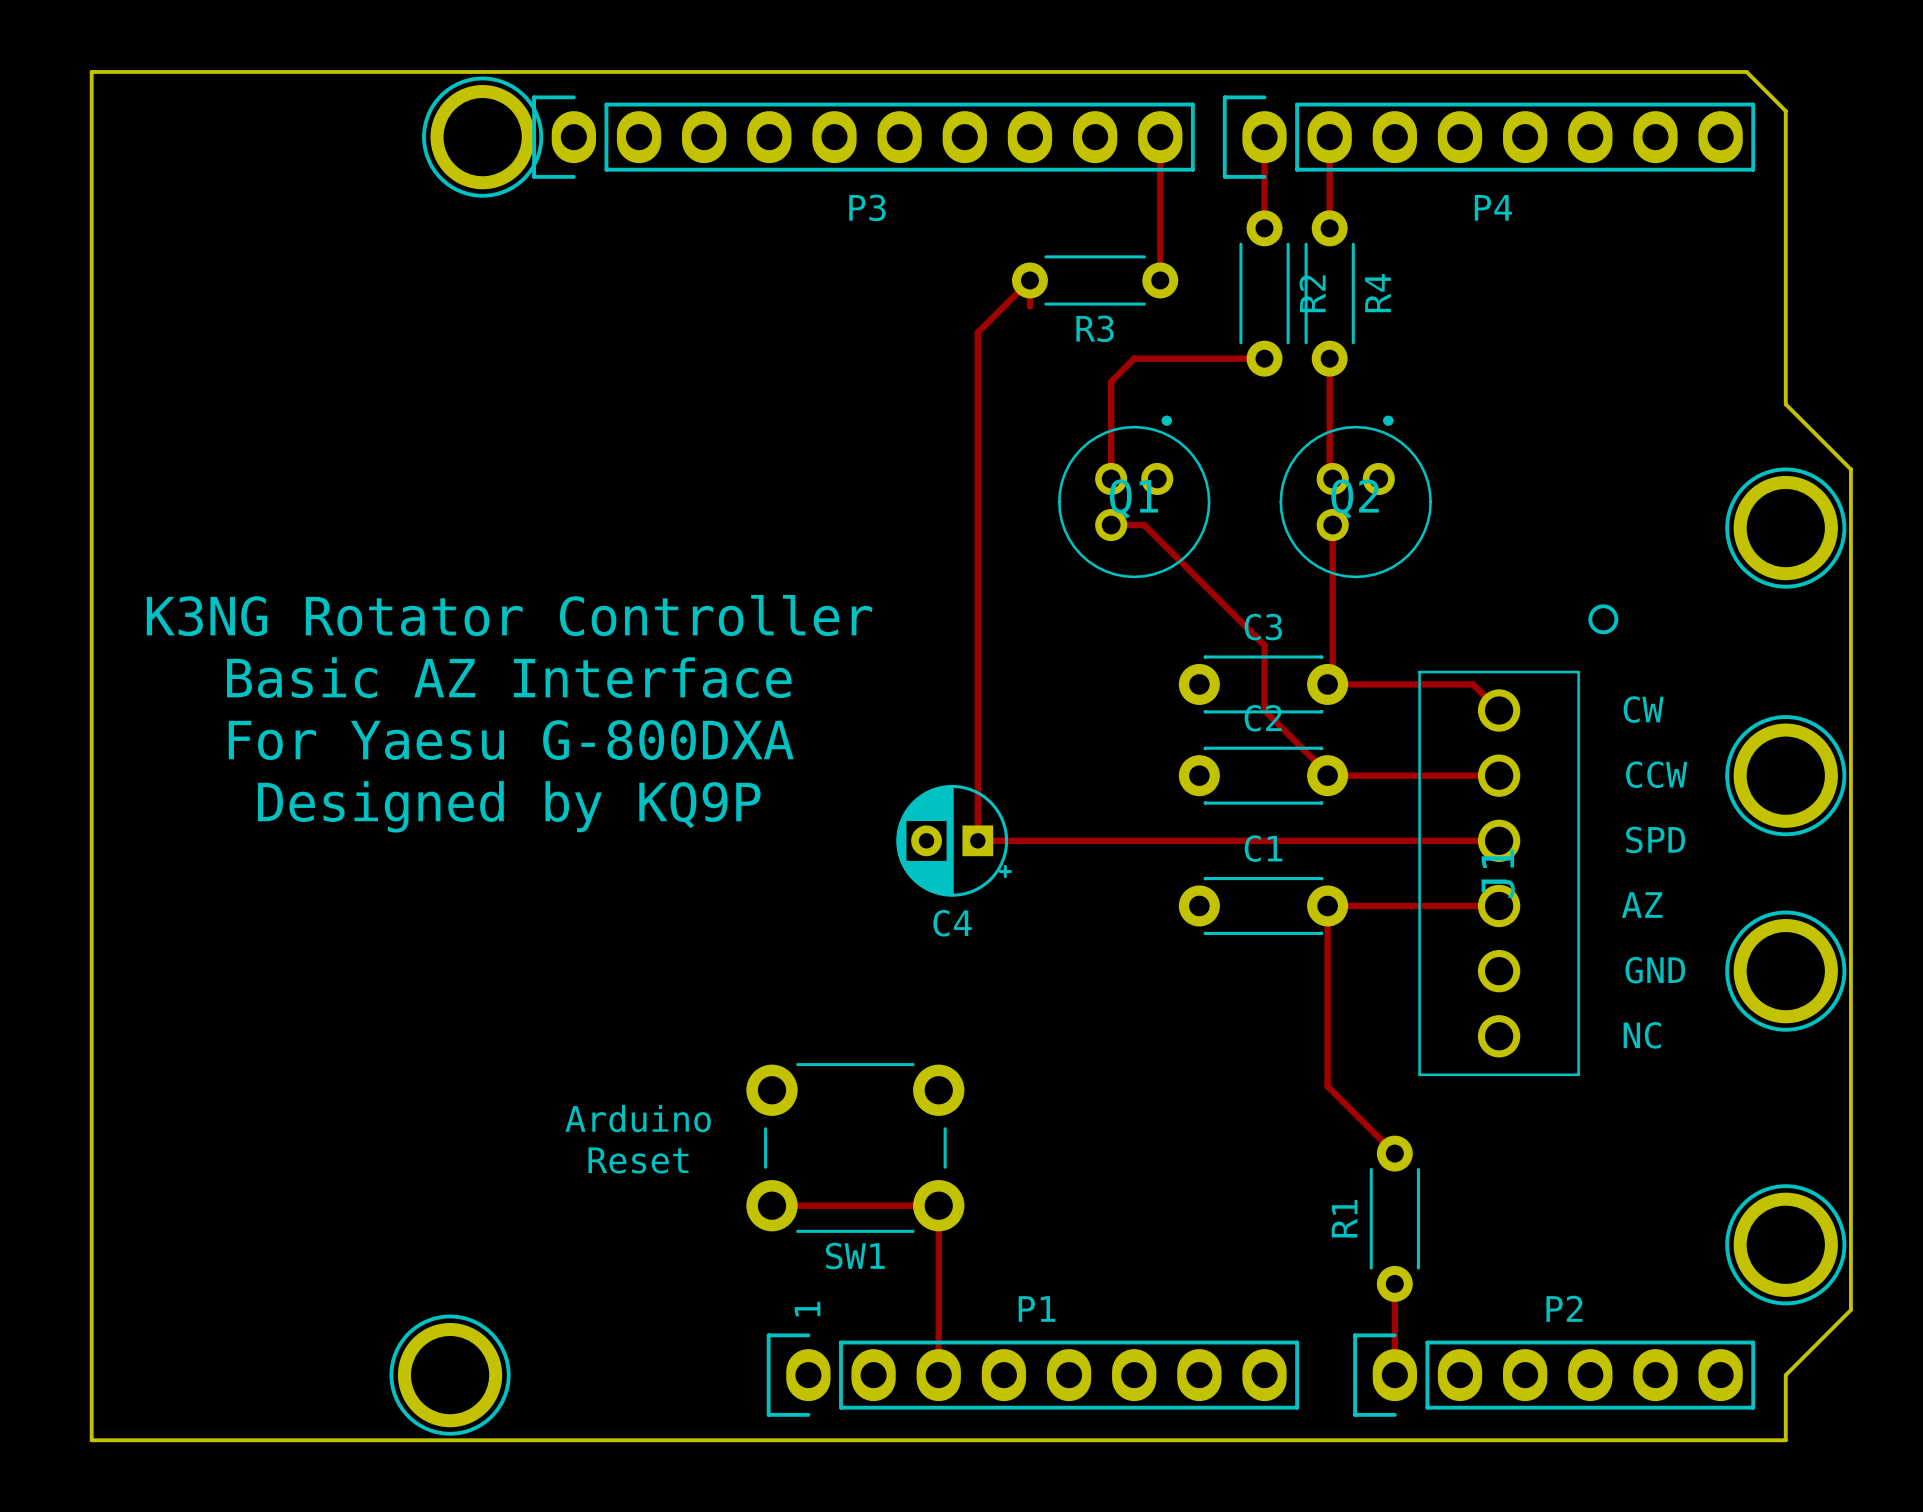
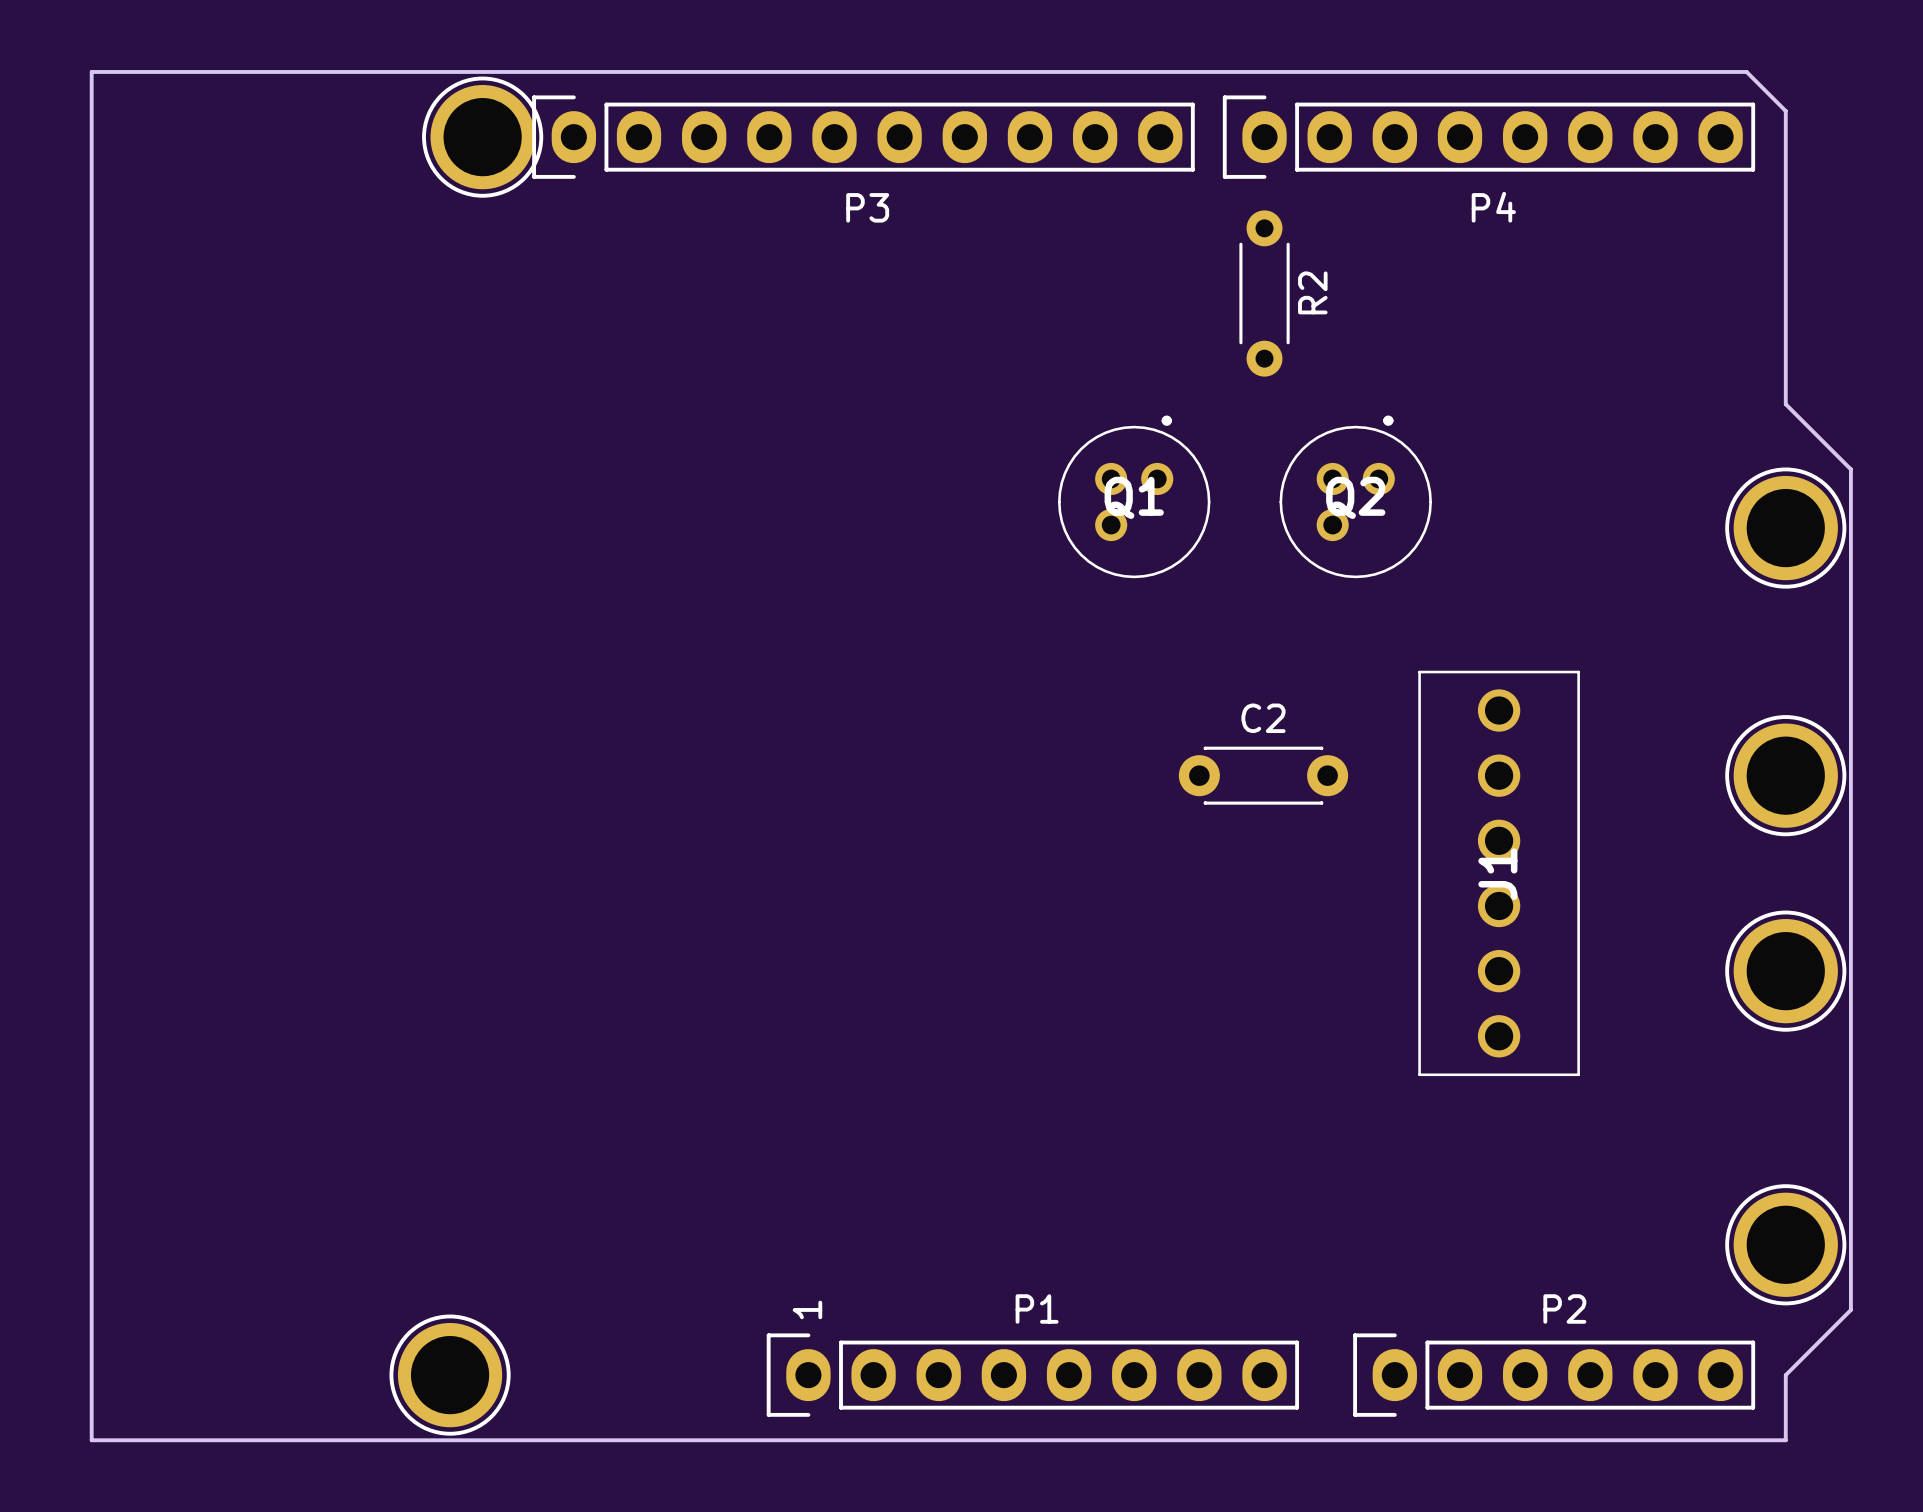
track: (1160, 137) (1160, 280) -> none
track: (1264, 137) (1264, 228) -> none
track: (1329, 137) (1329, 228) -> none
R3: (1095, 280) -> none
R4: (1329, 293) -> none
track: (1029, 306) (1029, 280) (977, 332) (977, 840) (1499, 840) -> none
track: (1264, 358) (1134, 358) (1111, 381) (1111, 478) -> none
track: (1329, 358) (1329, 475) (1332, 478) -> none
track: (1111, 525) (1144, 525) (1264, 645) (1264, 710) (1327, 775) (1499, 775) -> none
track: (1332, 525) (1332, 679) (1327, 684) (1473, 684) (1499, 710) -> none
drawing: [1588, 604, 1619, 635] -> none
text: K3NG Rotator Controller (509, 615) -> none
text: Basic AZ Interface (509, 677) -> none
C3: (1263, 684) -> none
text: CW (1643, 709) -> none
text: For Yaesu G-800DXA (511, 740) -> none
text: CCW (1656, 774) -> none
text: Designed by KQ9P (509, 806) -> none
text: SPD (1655, 839) -> none
C4: (954, 840) -> none
C1: (1263, 905) -> none
track: (1499, 905) (1327, 905) (1327, 1086) (1394, 1153) -> none
text: AZ (1642, 905) -> none
text: GND (1655, 970) -> none
text: NC (1642, 1035) -> none
text: Arduino (638, 1118) -> none
SW1: (855, 1147) -> none
text: Reset (638, 1160) -> none
track: (772, 1205) (938, 1205) (938, 1375) -> none
R1: (1394, 1218) -> none
track: (1394, 1283) (1394, 1375) -> none

